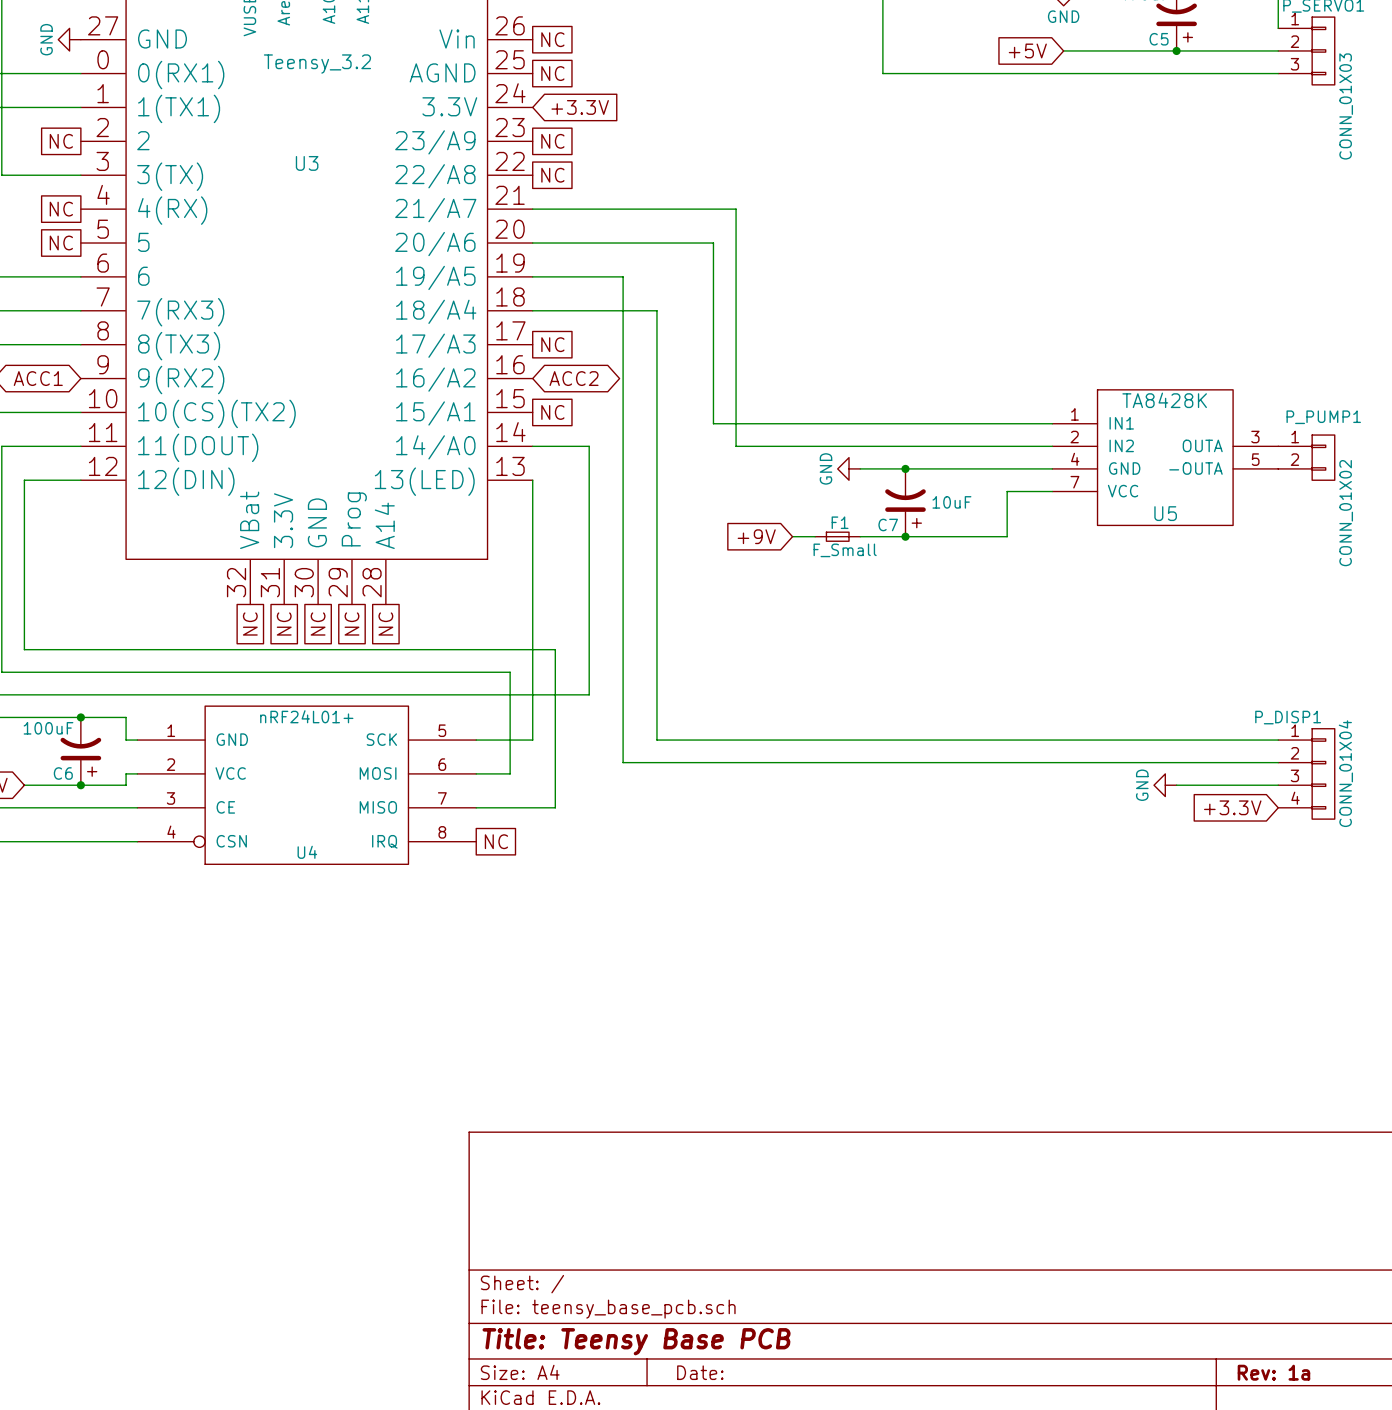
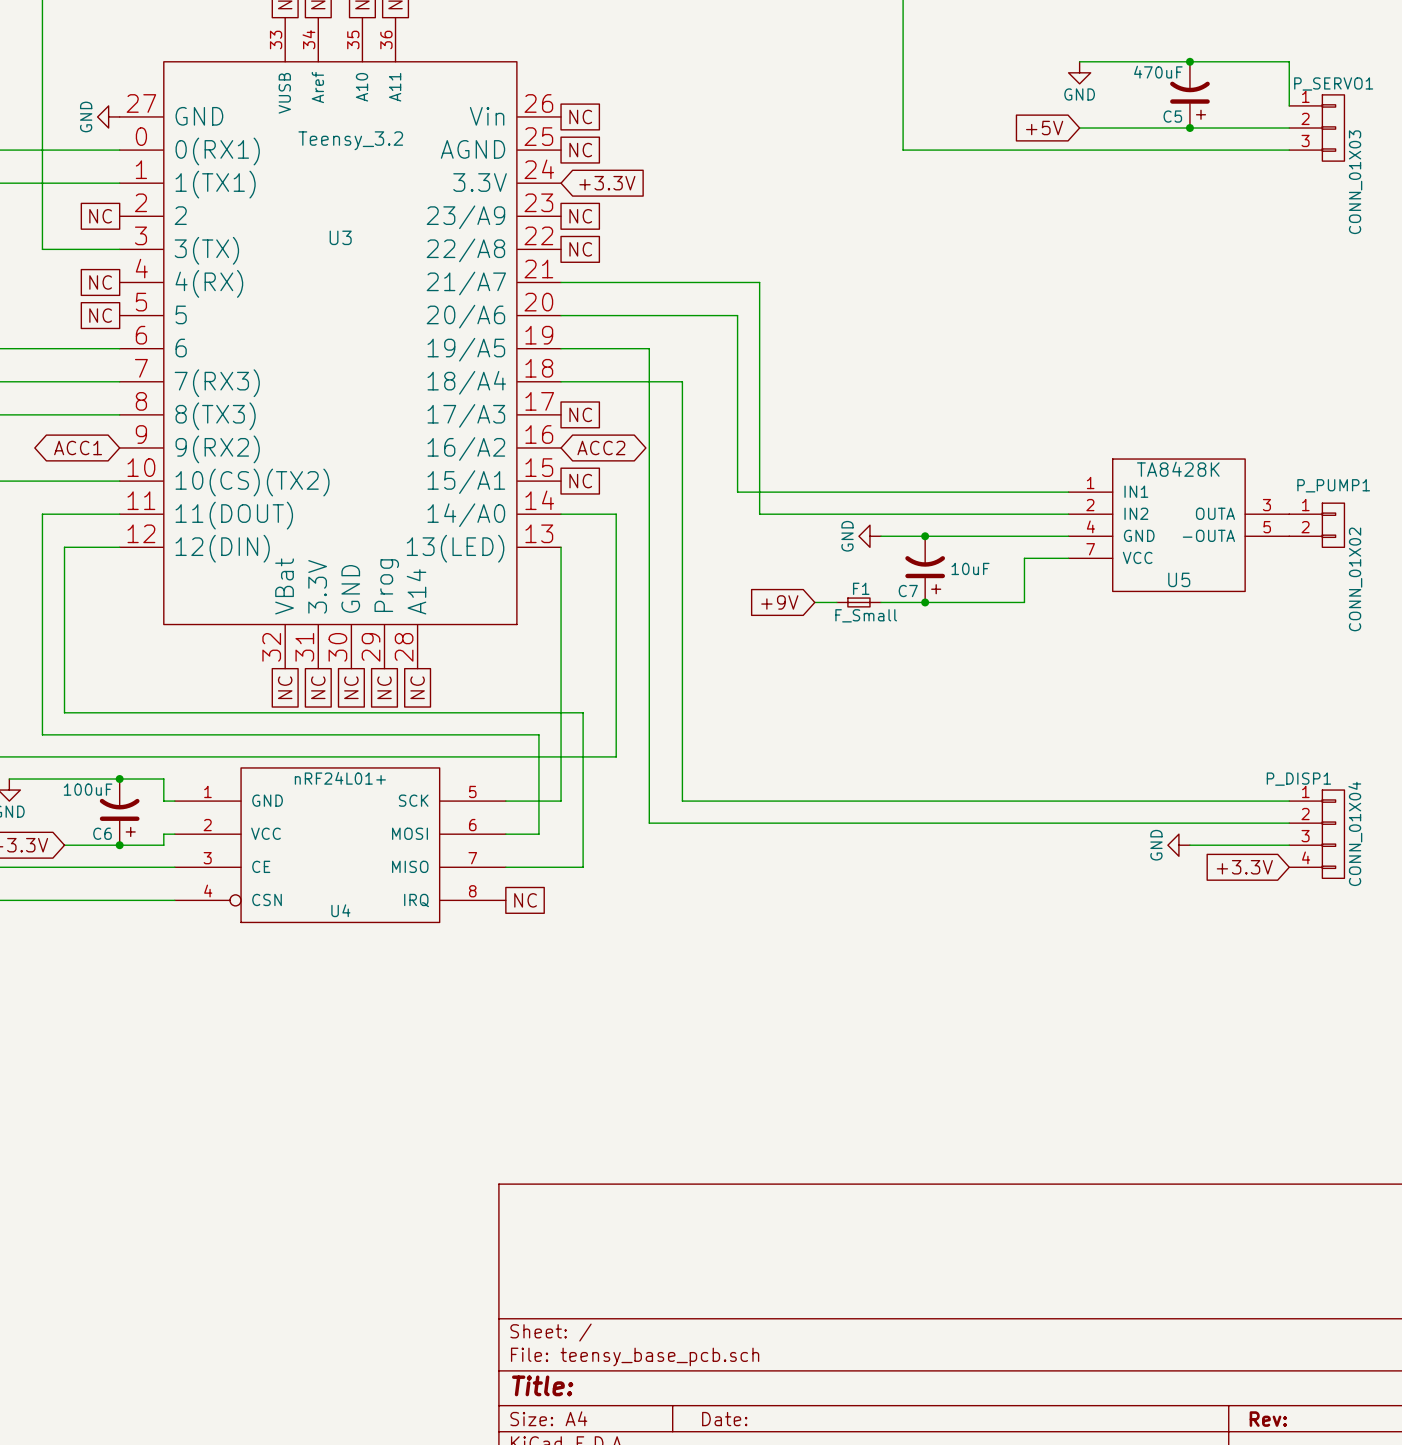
title block: Title: Teensy Base PCB (636, 1341) -> Title: (542, 1385)
title block: Rev: 1a (1273, 1372) -> Rev: (1268, 1419)

